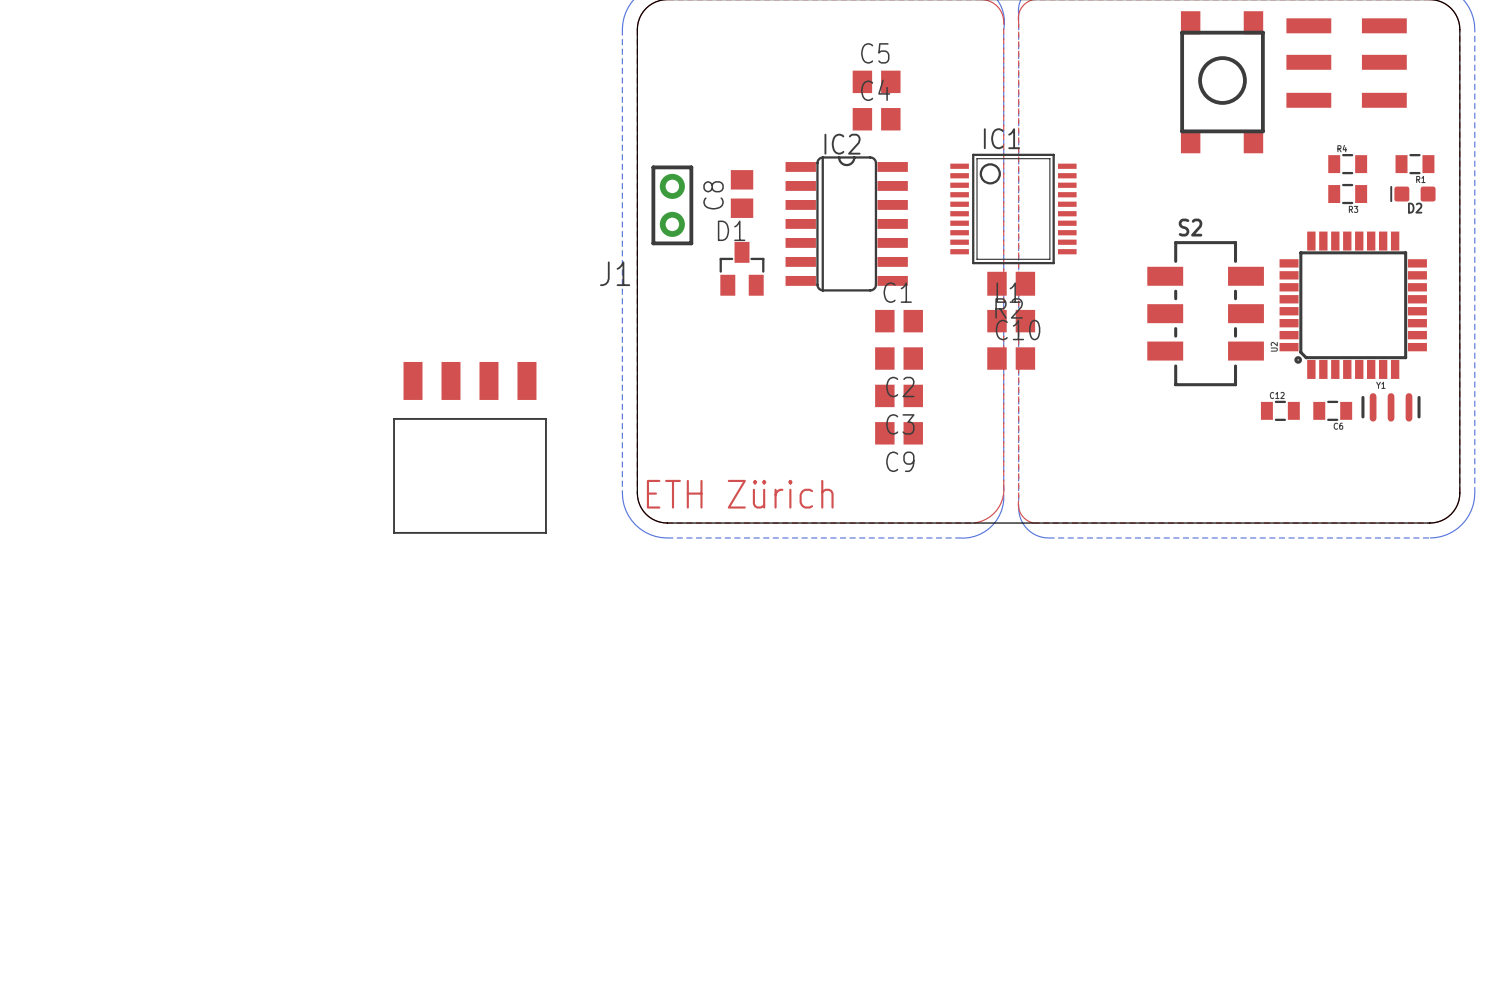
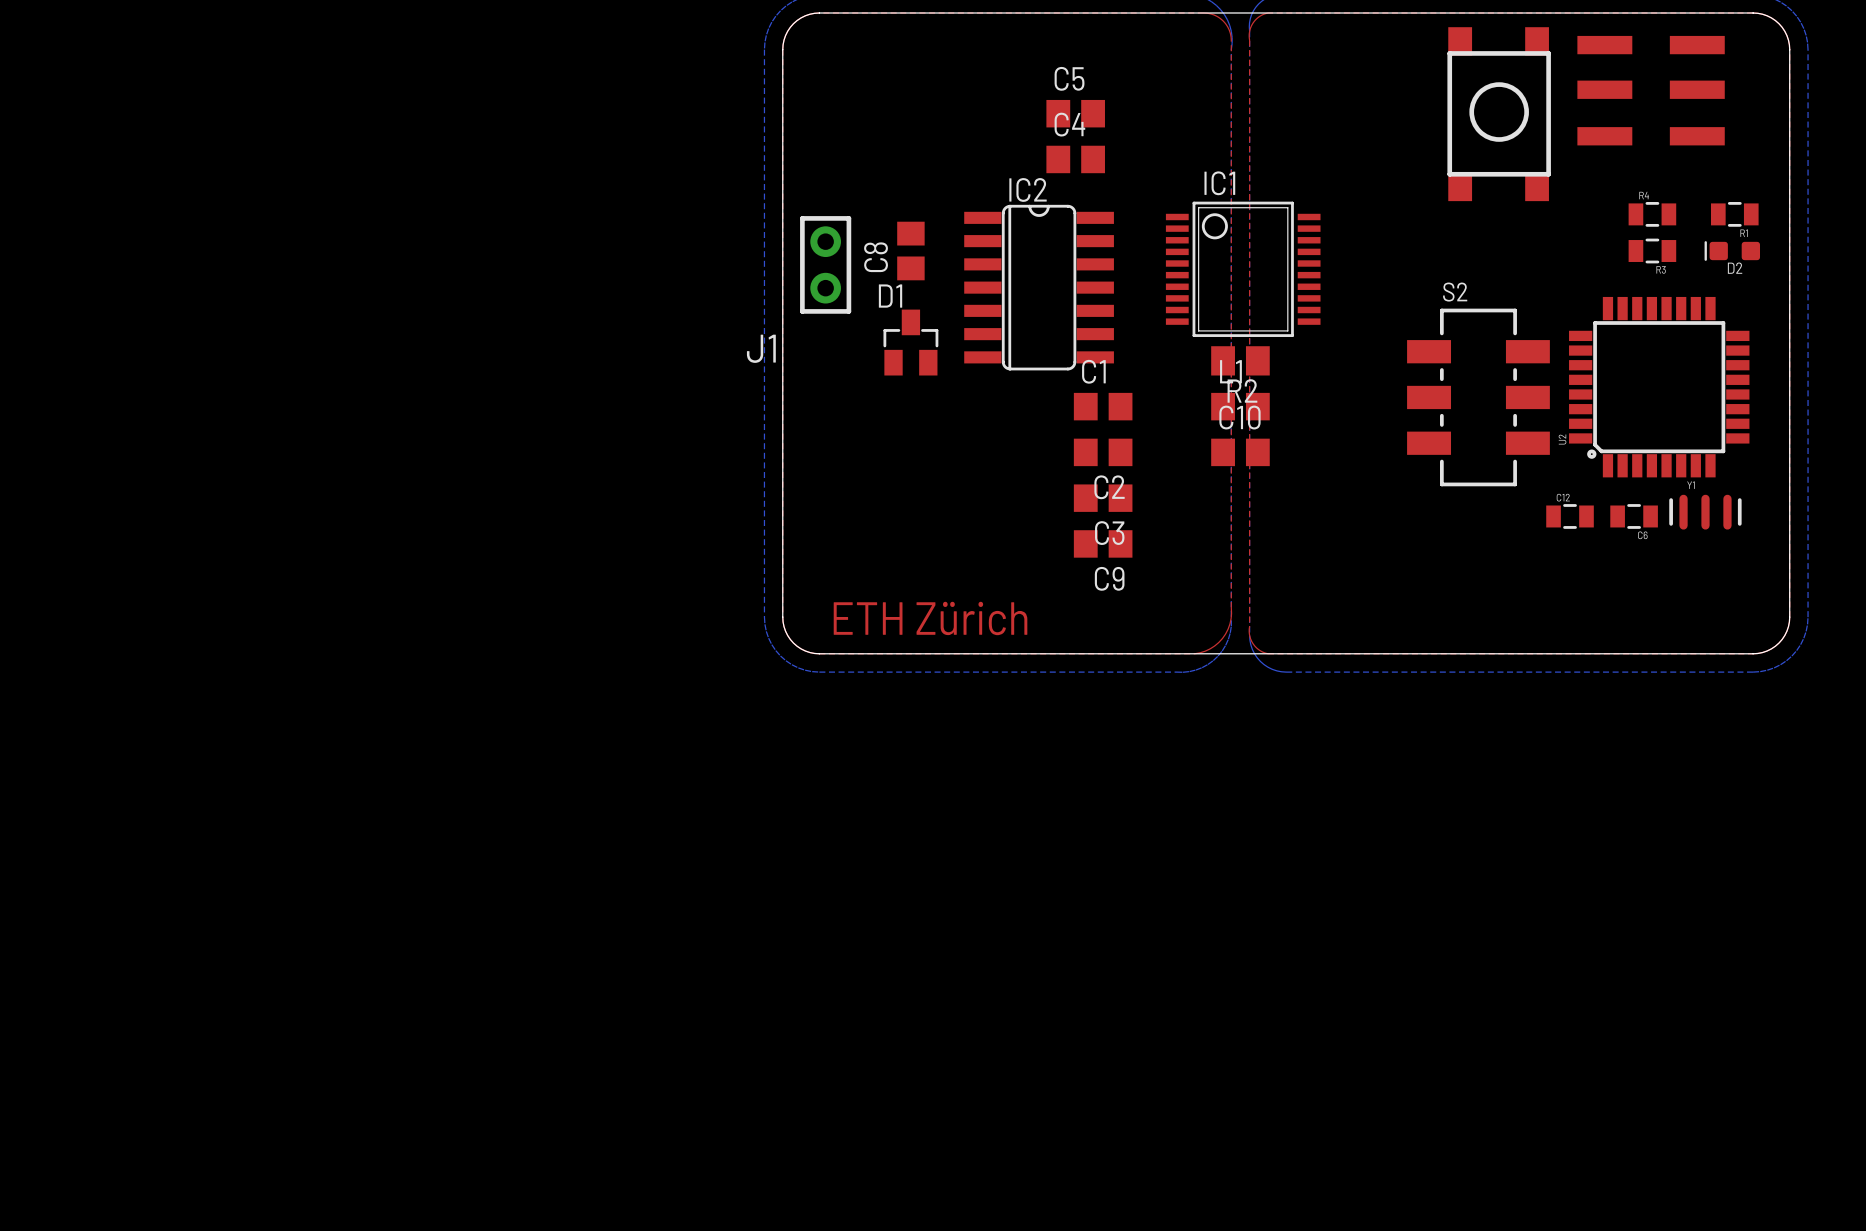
part: (469, 447) -> none

